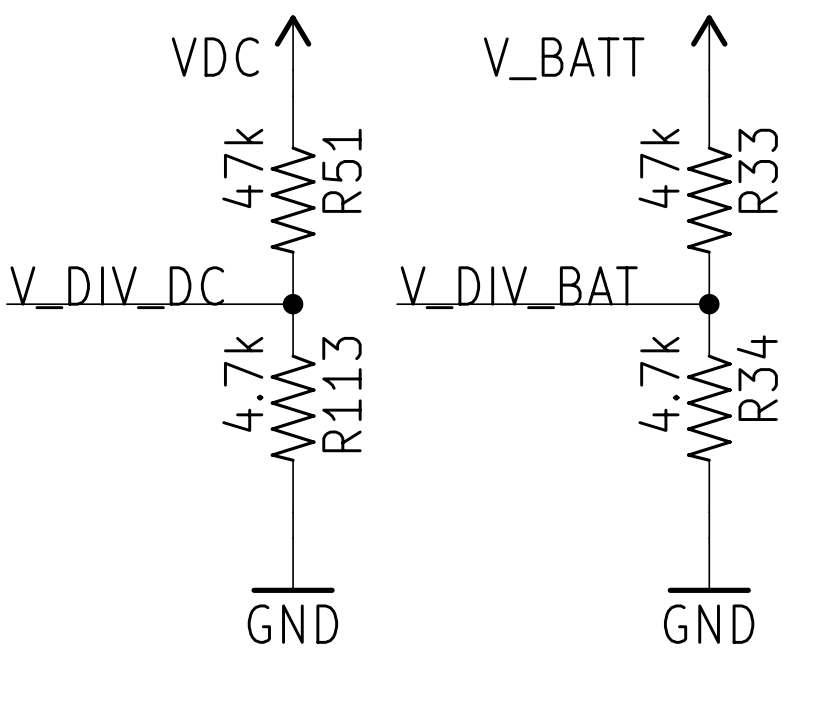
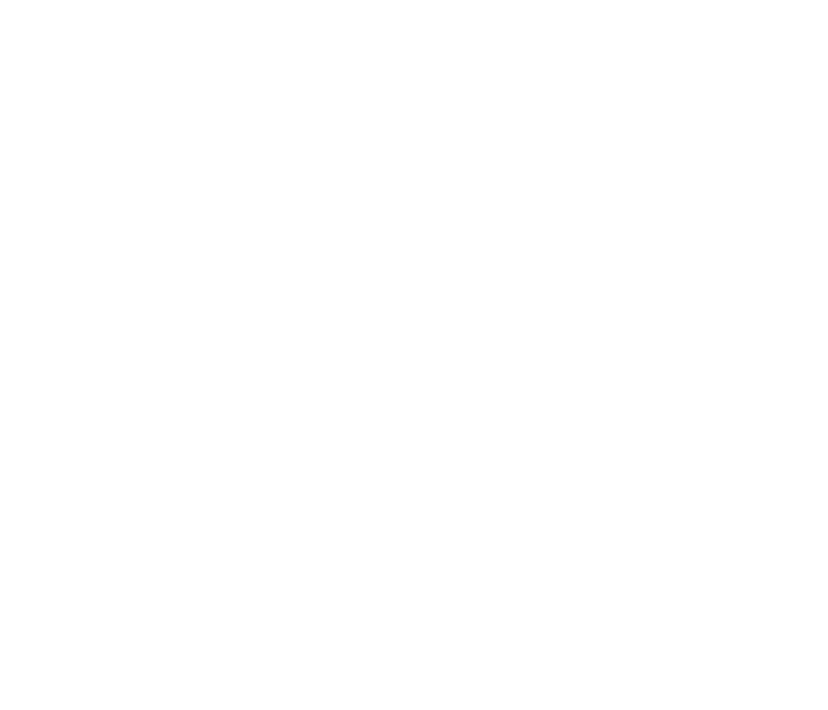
power symbol: VDC (293, 42) -> none
power symbol: V_BATT (709, 42) -> none
wire: (293, 70) (293, 96) -> none
wire: (709, 70) (709, 96) -> none
R51: 47k (293, 200) -> none
R33: 47k (709, 200) -> none
label: V_DIV_DC (117, 287) -> none
label: V_DIV_BAT (519, 287) -> none
wire: (6, 304) (293, 304) -> none
junction: (293, 304) -> none
wire: (397, 304) (709, 304) -> none
junction: (709, 304) -> none
R113: 4.7k (293, 408) -> none
R34: 4.7k (709, 408) -> none
wire: (293, 512) (293, 538) -> none
wire: (709, 512) (709, 538) -> none
power symbol: GND (293, 565) -> none
power symbol: GND (709, 565) -> none

